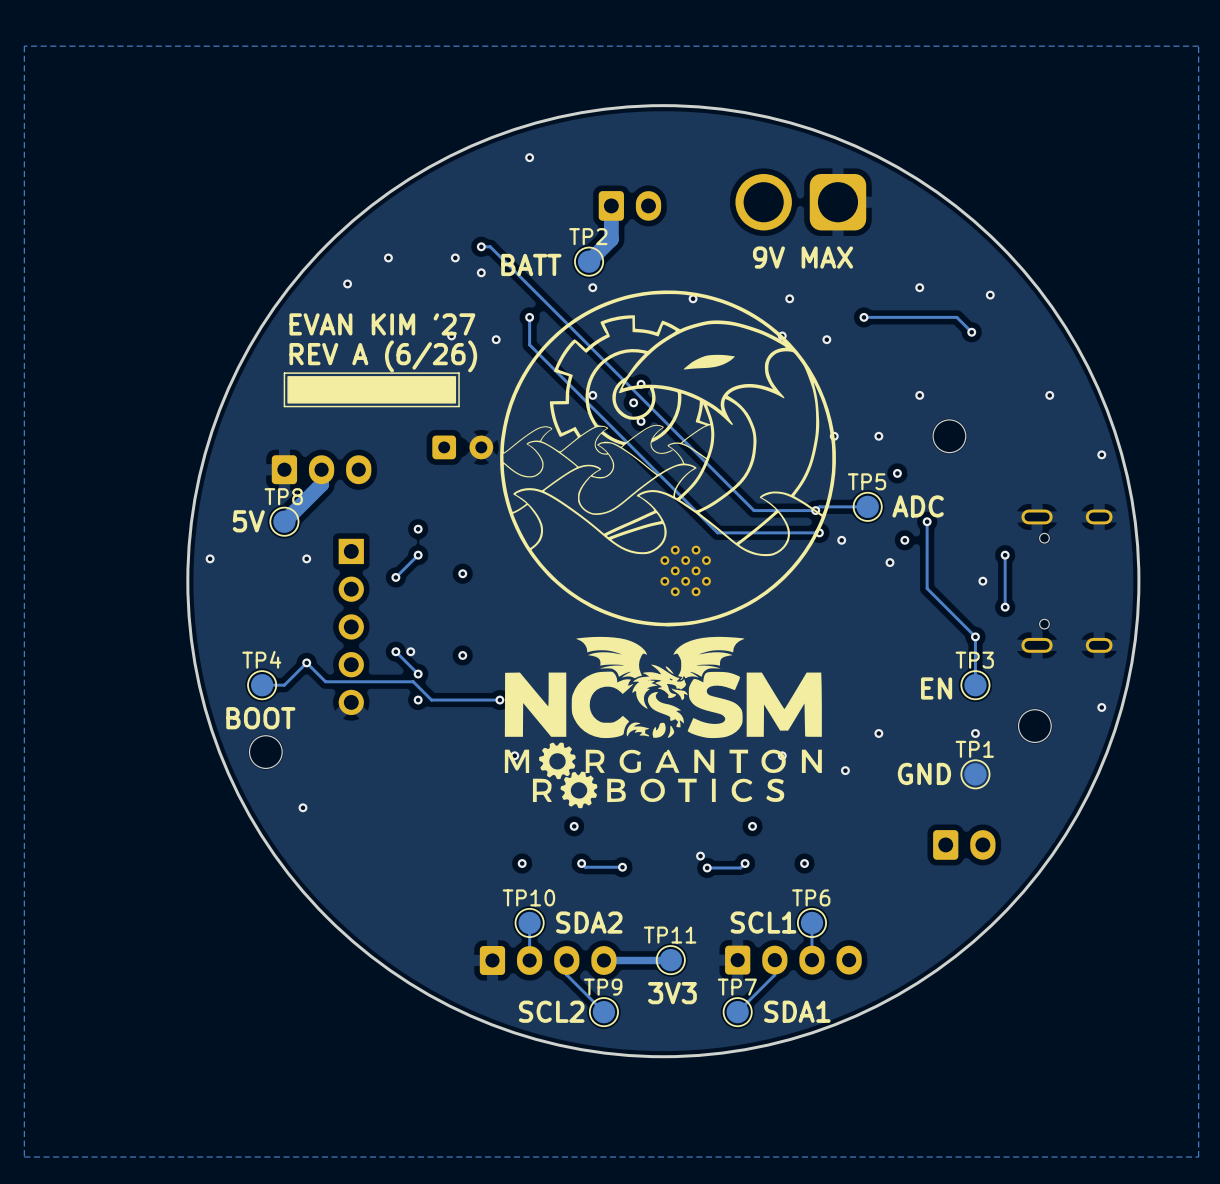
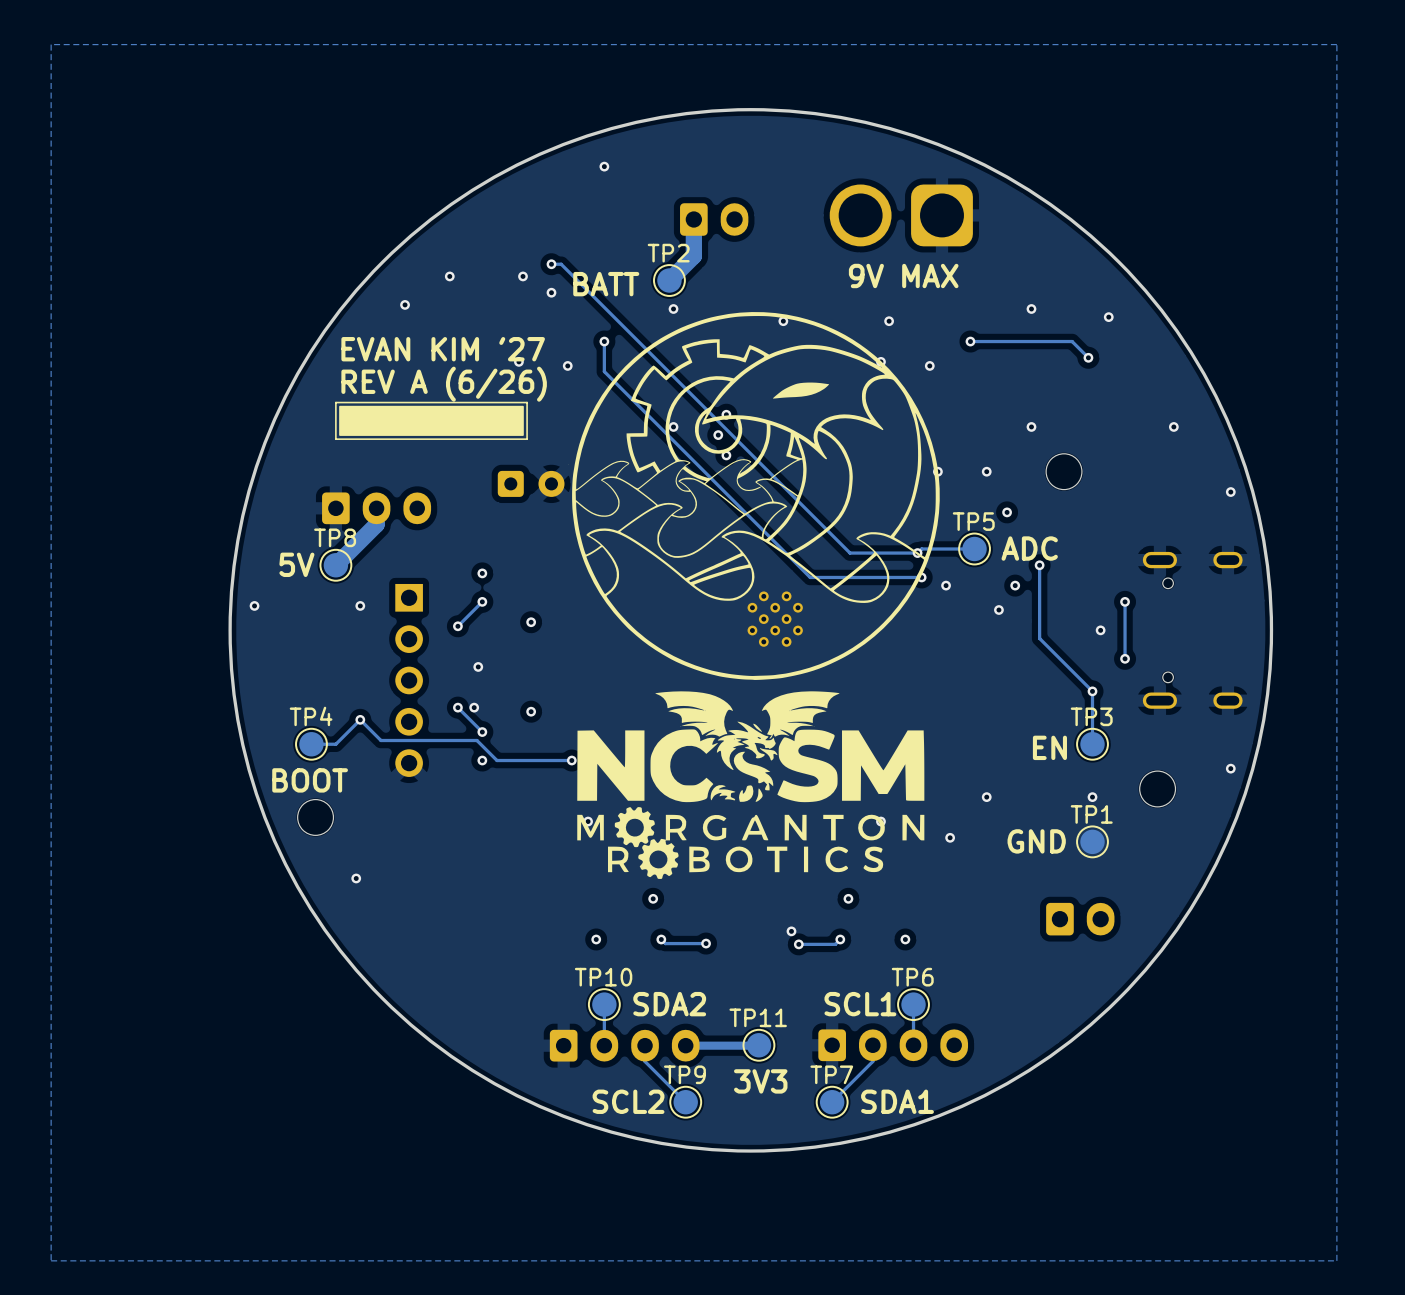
via: none -> (478, 666)

